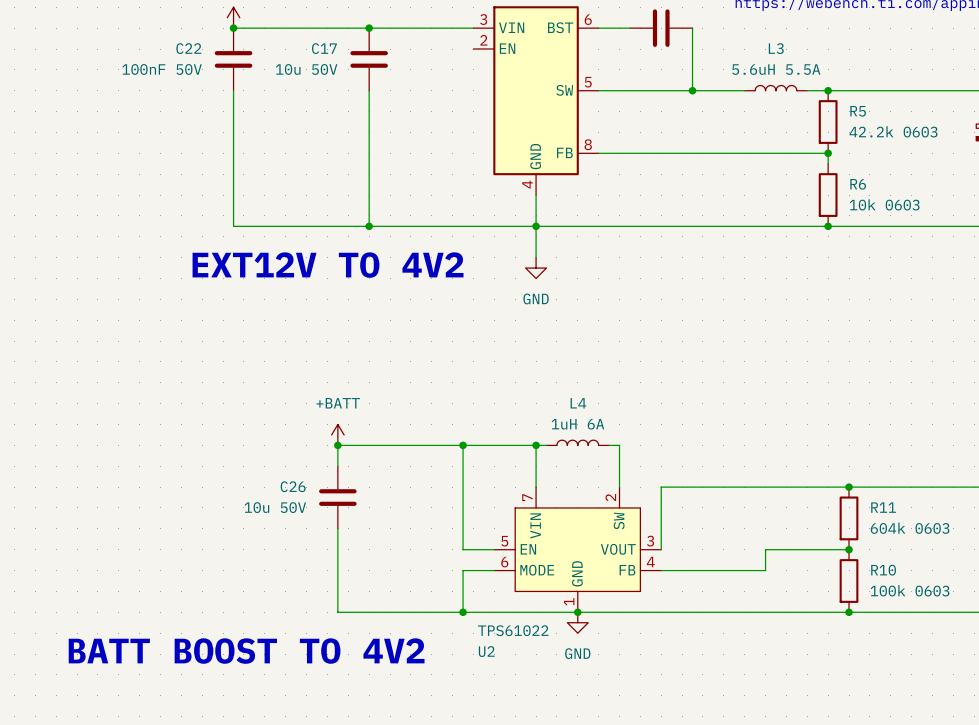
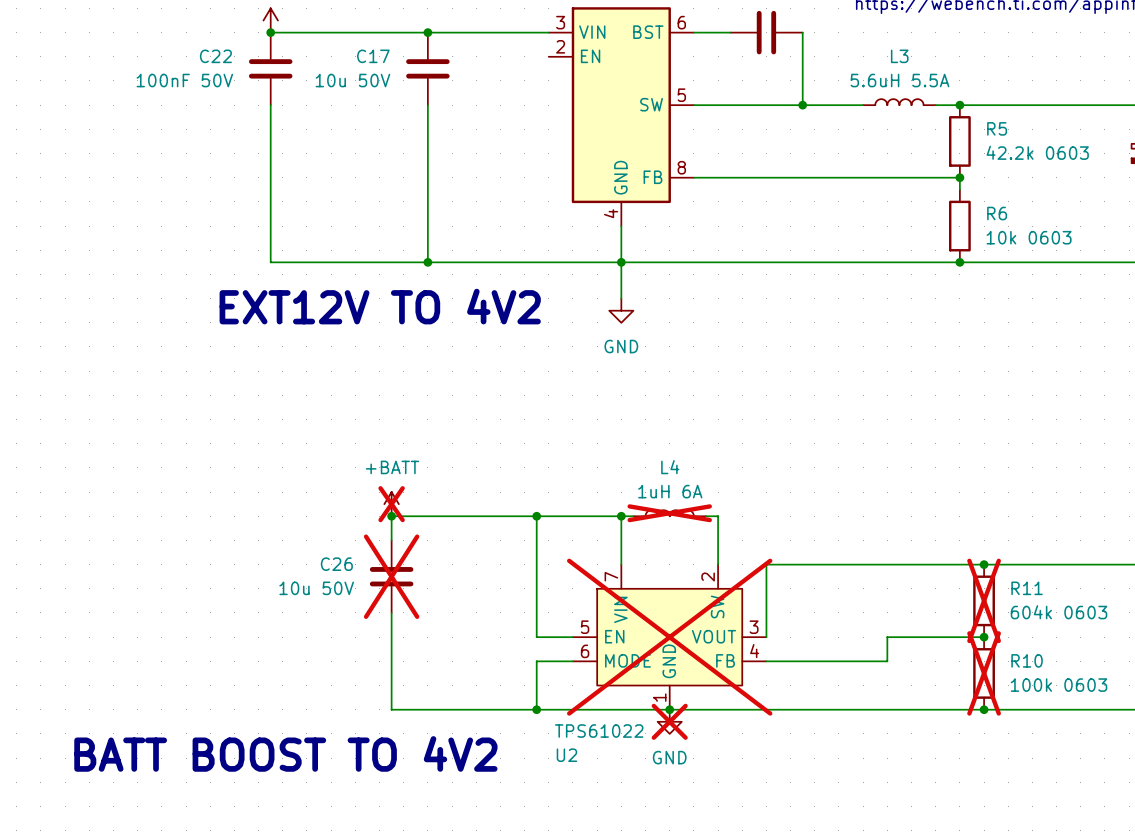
power symbol do-not-place cross: none -> (391, 504)
L4 do-not-place cross: none -> (669, 513)
C26 do-not-place cross: none -> (391, 576)
R11 do-not-place cross: none -> (984, 600)
U2 do-not-place cross: none -> (669, 637)
R10 do-not-place cross: none -> (984, 673)
power symbol do-not-place cross: none -> (669, 721)

